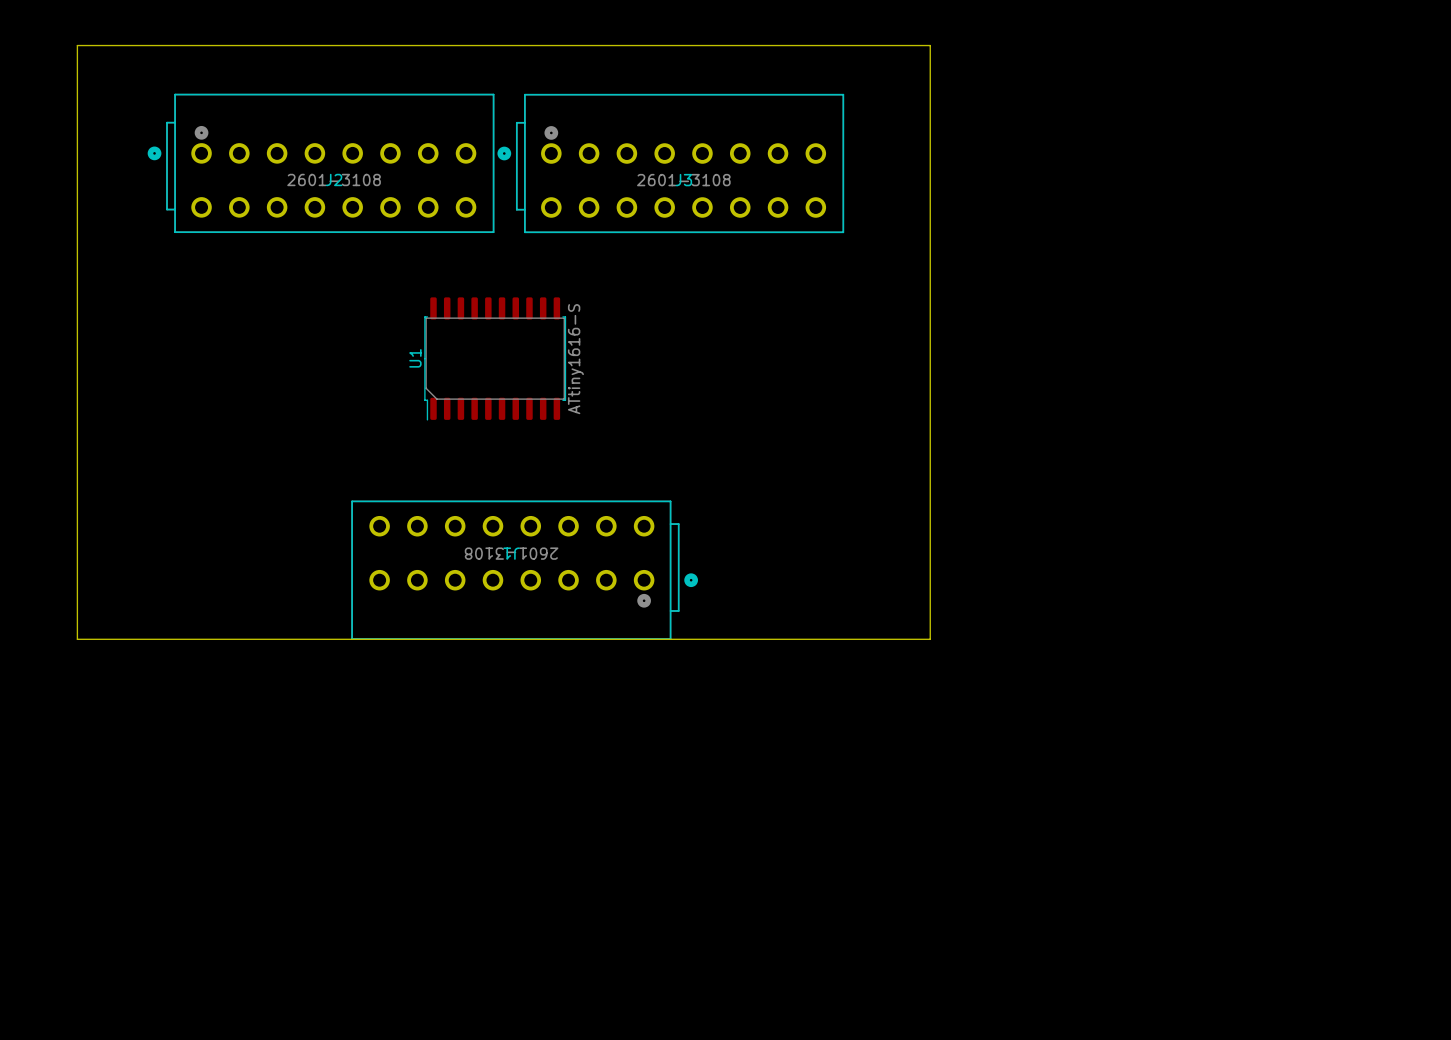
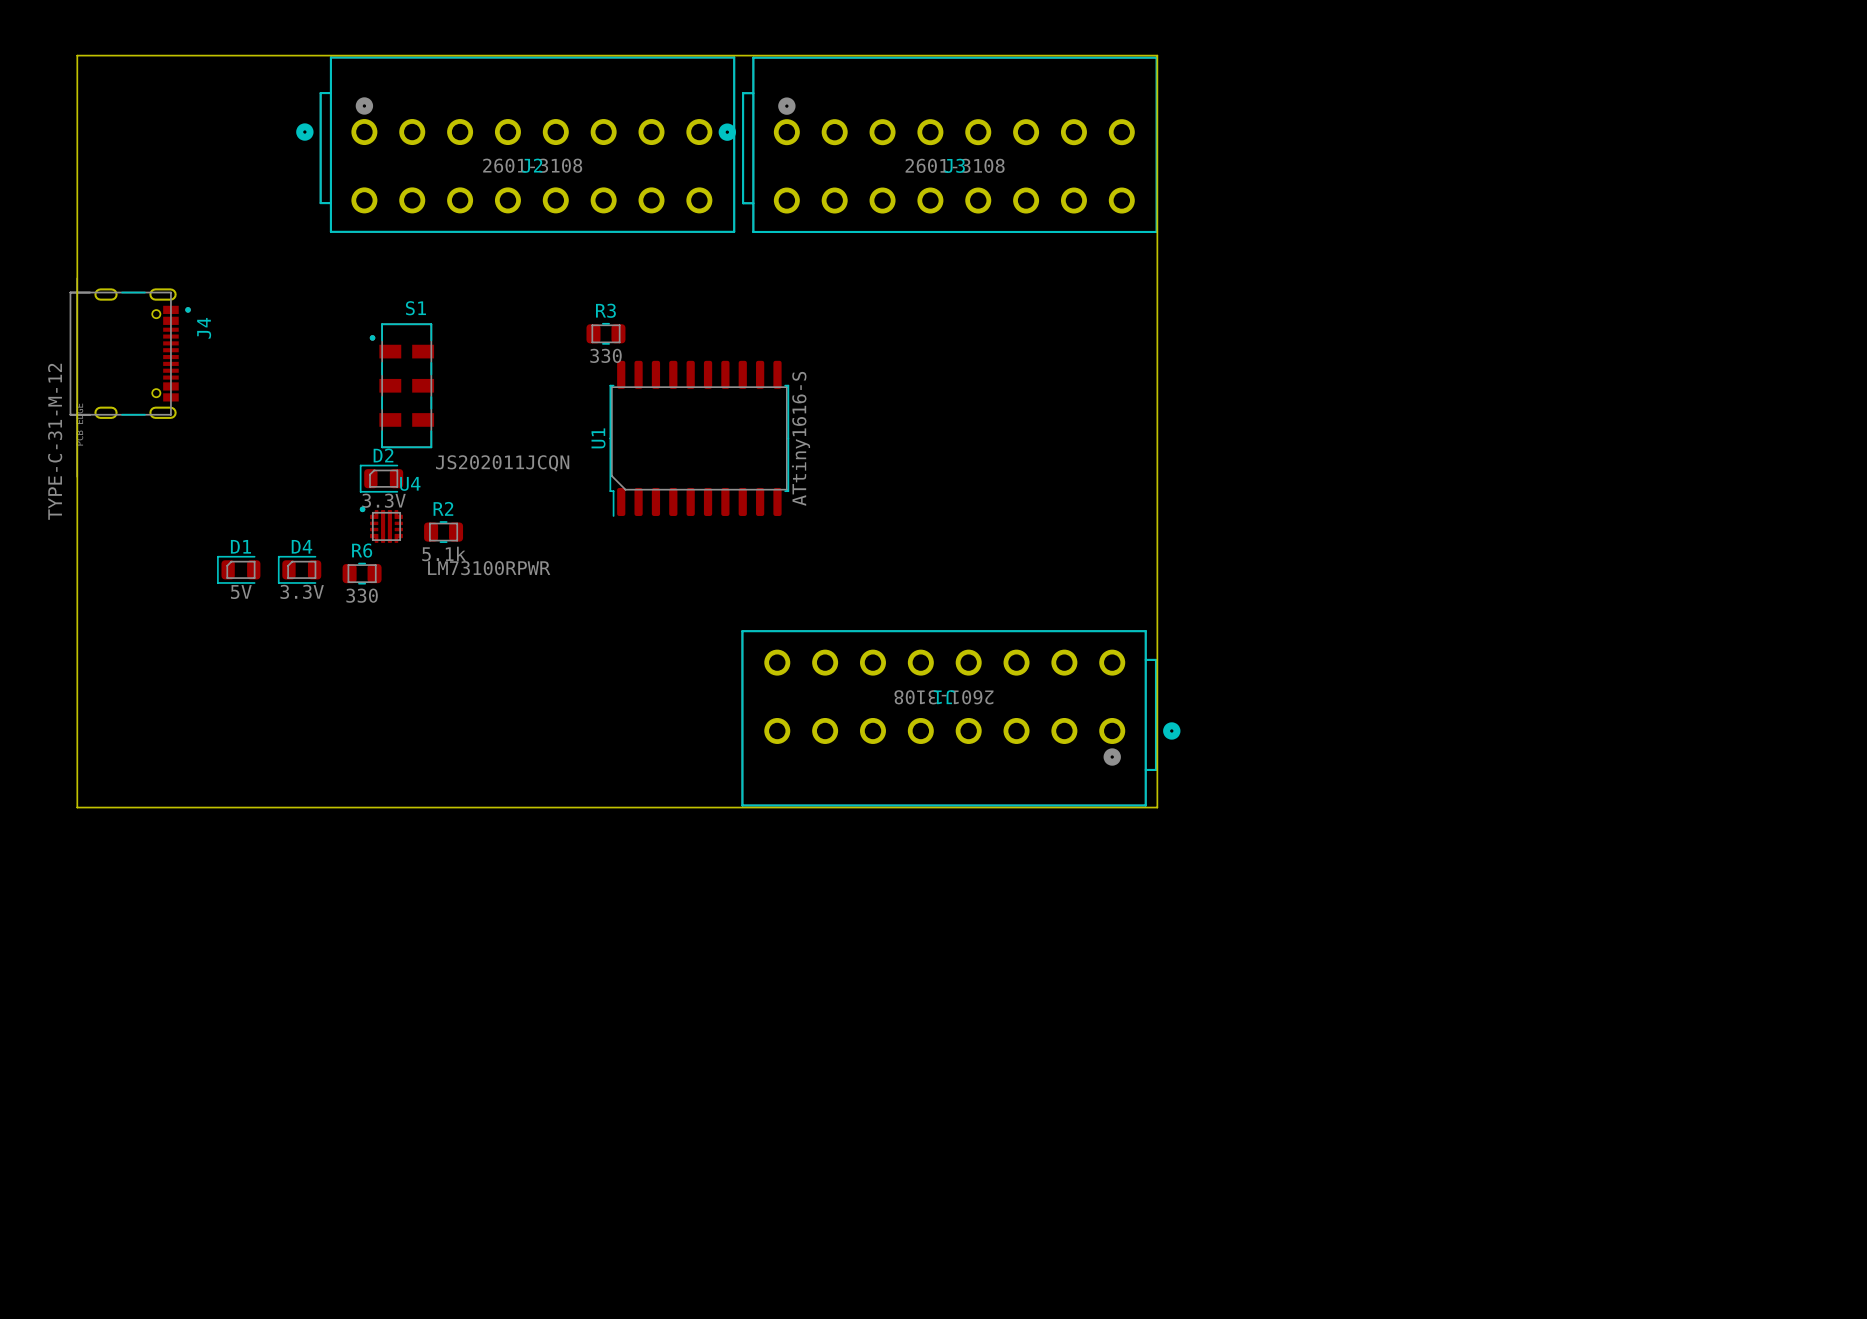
J2 position: (321, 163) -> (515, 144)
J3 position: (670, 163) -> (938, 144)
R3: none -> 330 (605, 333)
J4: none -> TYPE-C-31-M-12 (130, 377)
S1: none -> JS202011JCQN (401, 385)
U1 position: (495, 358) -> (699, 438)
D2: none -> 3.3V (381, 478)
U4: none -> LM73100RPWR (381, 524)
R2: none -> 5.1k (443, 532)
D1: none -> 5V (238, 569)
D4: none -> 3.3V (299, 569)
R6: none -> 330 (362, 573)
J1 position: (524, 570) -> (960, 718)

